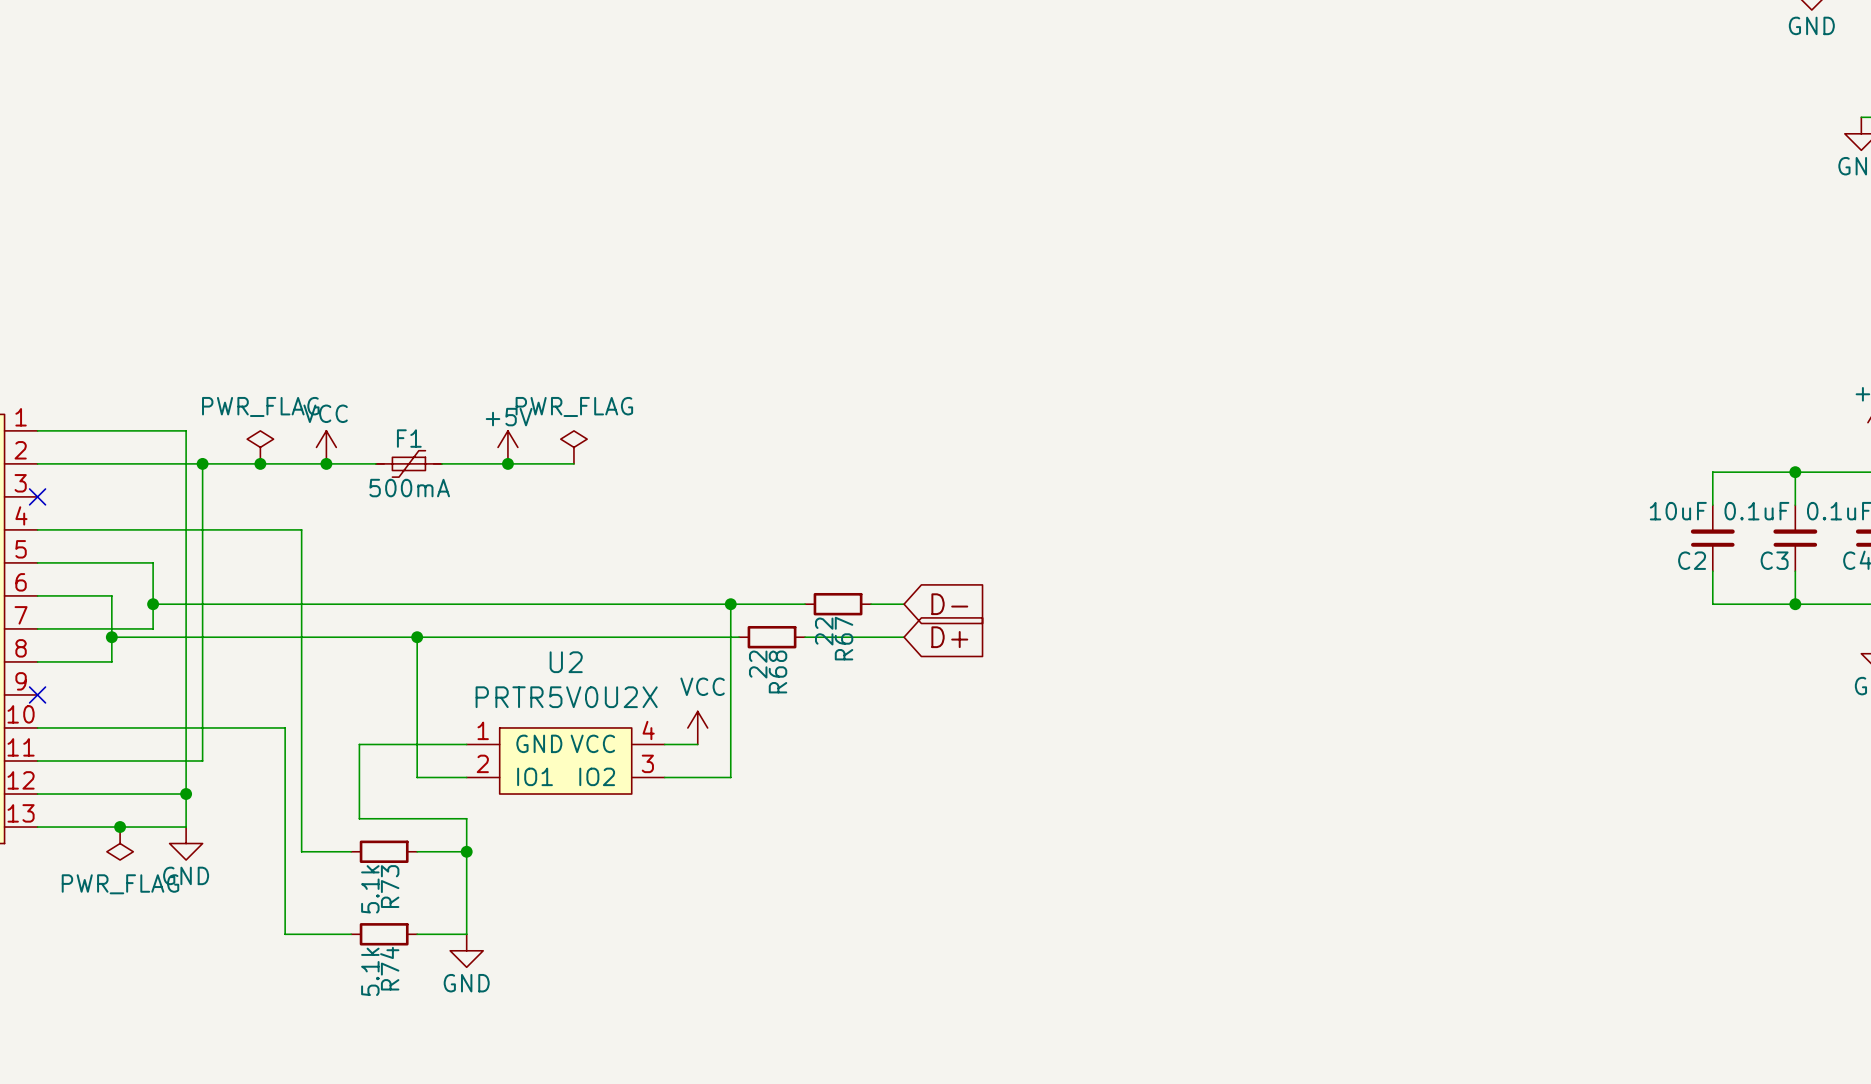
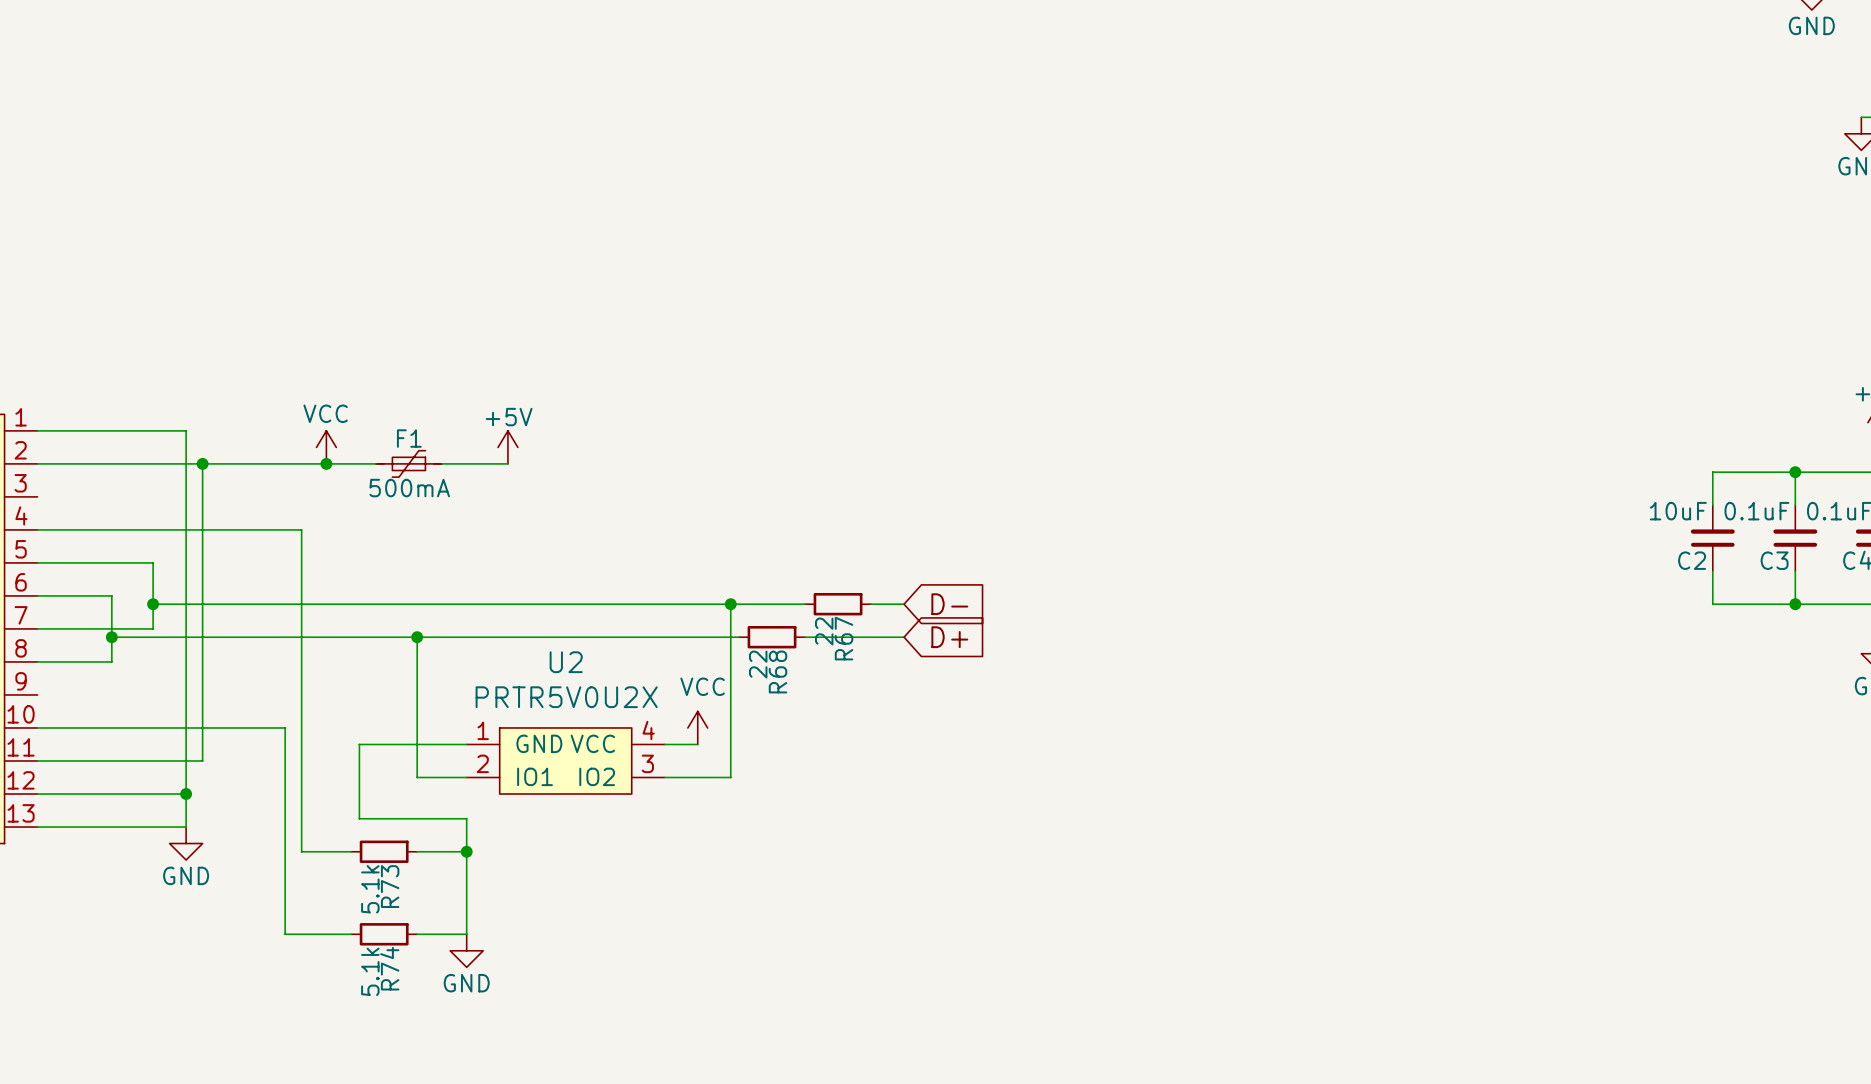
power symbol: PWR_FLAG (260, 447) -> none
power symbol: PWR_FLAG (573, 447) -> none
junction: (260, 463) -> none
wire: (507, 463) (573, 463) -> none
junction: (507, 463) -> none
no-connect mark: (37, 496) -> none
no-connect mark: (37, 694) -> none
junction: (120, 827) -> none
power symbol: PWR_FLAG (120, 843) -> none

